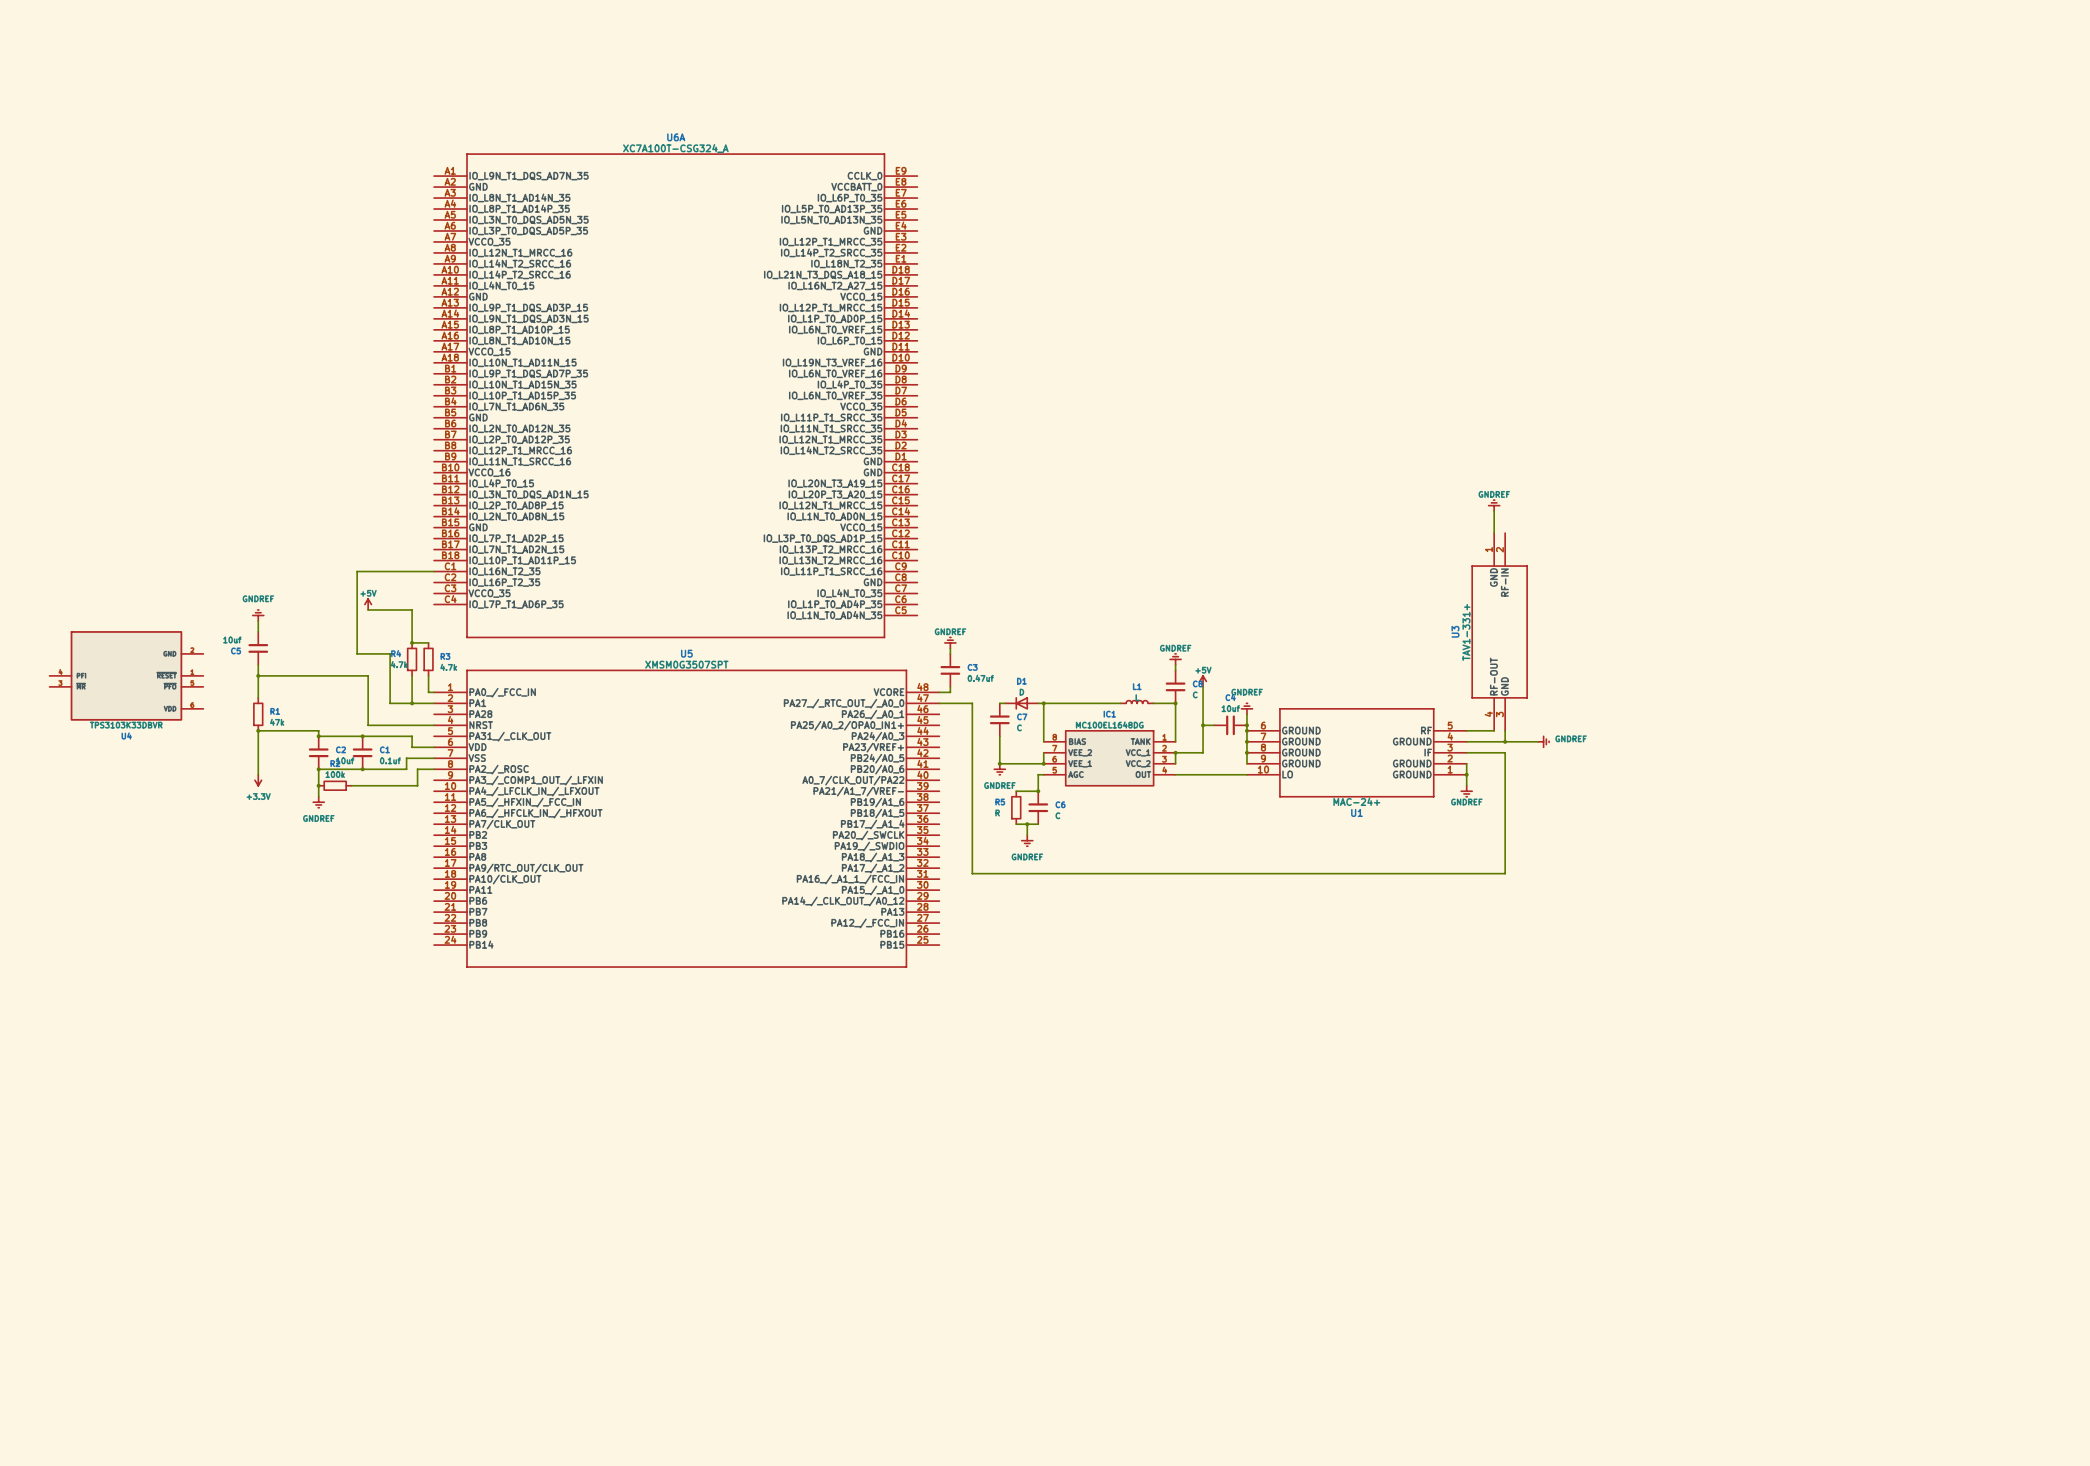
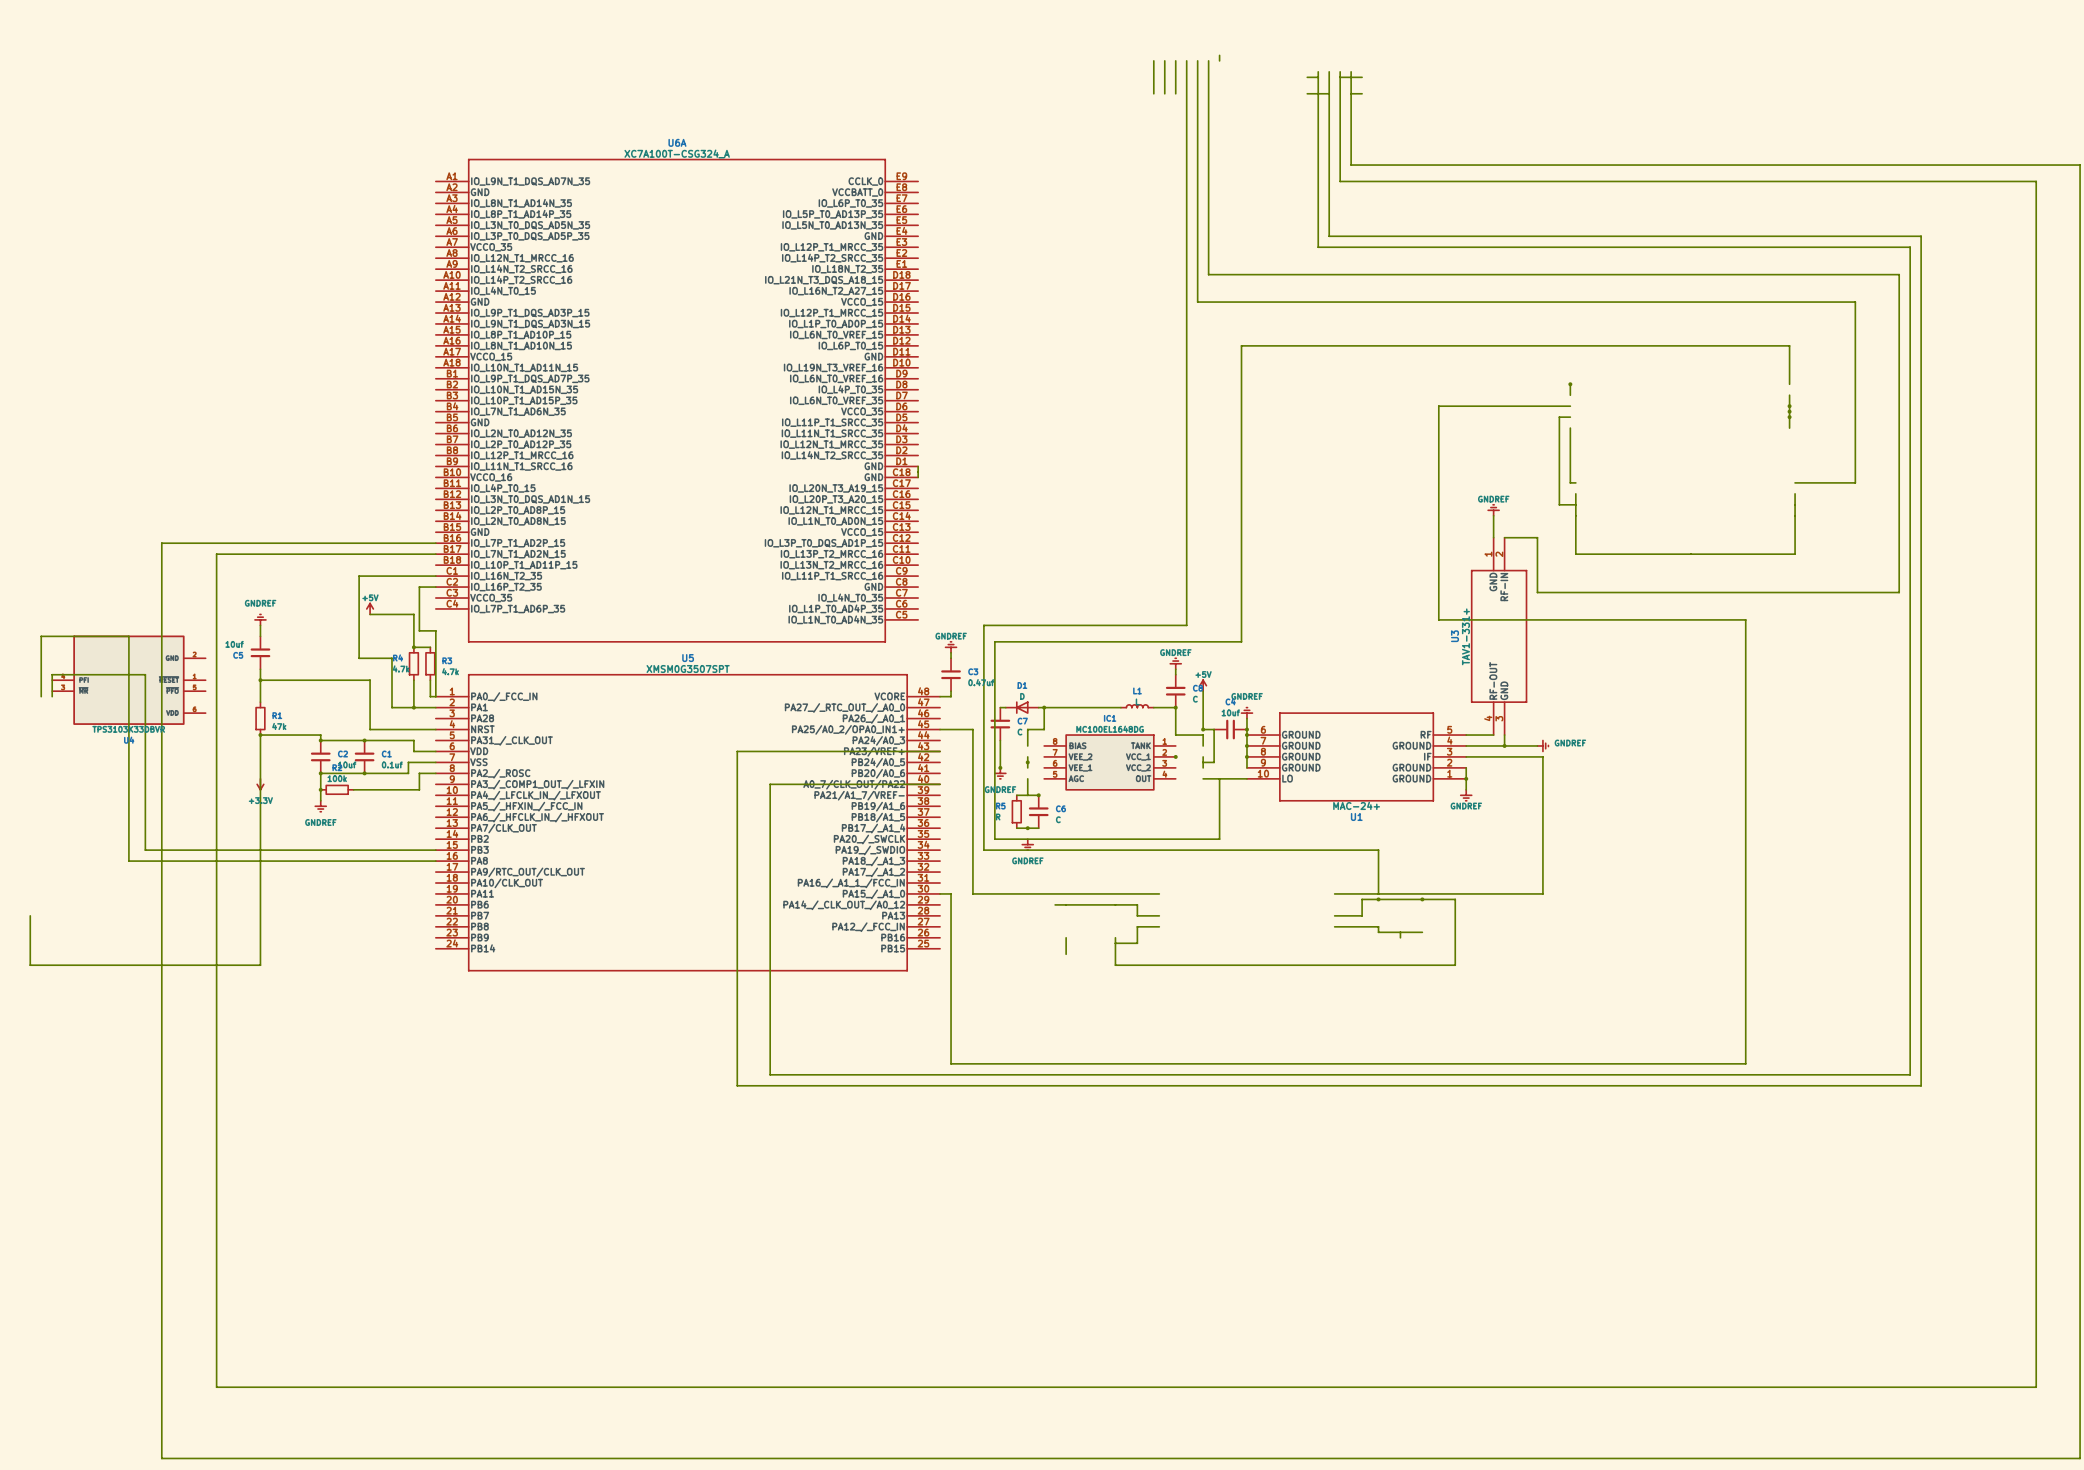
wire: none -> (1219, 55) (1219, 60)
wire: none -> (1153, 60) (1153, 93)
wire: none -> (1164, 60) (1164, 93)
wire: none -> (1175, 60) (1175, 93)
wire: none -> (1186, 60) (1186, 625) (983, 625) (983, 850) (1378, 850) (1378, 893)
wire: none -> (1197, 60) (1197, 302) (1855, 302) (1855, 482) (1795, 482)
wire: none -> (1208, 60) (1208, 274) (1899, 274) (1899, 592) (1537, 592) (1537, 537) (1504, 537)
wire: none -> (1318, 71) (1318, 247) (1910, 247) (1910, 1074) (770, 1074) (770, 784) (940, 784)
wire: none -> (1329, 71) (1329, 236) (1921, 236) (1921, 1085) (737, 1085) (737, 751) (940, 751)
wire: none -> (1340, 71) (1340, 181) (2036, 181) (2036, 1387) (216, 1387) (216, 554) (435, 554)
wire: none -> (1351, 71) (1351, 165) (2080, 165) (2080, 1458) (161, 1458) (161, 543) (435, 543)
wire: none -> (1307, 77) (1318, 77)
wire: none -> (1340, 77) (1362, 77)
wire: none -> (1307, 93) (1329, 93)
wire: none -> (1351, 93) (1362, 93)
wire: none -> (1570, 384) (1570, 395)
junction: none -> (1570, 384)
wire: none -> (1789, 384) (1789, 345) (1241, 345) (1241, 641) (994, 641) (994, 839) (1219, 839) (1219, 778)
wire: none -> (1789, 395) (1789, 428)
wire: none -> (1570, 406) (1438, 406) (1438, 619) (1745, 619) (1745, 1063) (951, 1063) (951, 893) (940, 893)
junction: none -> (1789, 406)
junction: none -> (1789, 411)
wire: none -> (1570, 417) (1559, 417) (1559, 504) (1575, 504)
junction: none -> (1789, 417)
wire: none -> (1570, 428) (1570, 482) (1575, 482)
wire: none -> (918, 466) (918, 477)
wire: none -> (1575, 493) (1575, 554) (1795, 554) (1795, 493)
wire: none -> (435, 587) (419, 587) (419, 630) (435, 630) (435, 696)
wire: none -> (41, 696) (41, 636) (128, 636) (128, 861) (435, 861)
wire: none -> (52, 696) (52, 674) (145, 674) (145, 850) (435, 850)
wire: (939, 703) (972, 703) (972, 725) -> (940, 729) (972, 729)
wire: (1043, 725) (1043, 741) -> (1044, 729) (1027, 729) (1027, 745)
wire: (1203, 725) (1203, 730) -> (1175, 735) (1203, 735)
wire: none -> (1214, 729) (1214, 762) (1203, 762)
wire: (1175, 730) (1175, 741) -> (1203, 756) (1203, 767)
wire: (1203, 741) (1203, 752) (1175, 752) (1175, 763) -> none
wire: (1043, 752) (1043, 763) (999, 763) -> none
wire: (1505, 752) (1505, 873) (972, 873) -> (1504, 756) (1542, 756) (1542, 893) (1334, 893)
junction position: (1043, 763) -> (1027, 762)
wire: none -> (260, 778) (260, 965) (30, 965) (30, 915)
wire: none -> (1027, 778) (1027, 795)
wire: (1043, 774) (1038, 774) (1038, 791) -> none
wire: (1175, 774) (1203, 774) -> none
wire: (1027, 824) (1027, 835) -> (1027, 756) (1027, 767)
wire: none -> (972, 877) (972, 893) (1159, 893)
junction: none -> (1378, 899)
junction: none -> (1422, 899)
wire: none -> (1055, 904) (1137, 904) (1137, 915) (1159, 915)
wire: none -> (1334, 915) (1362, 915) (1362, 899) (1455, 899) (1455, 965) (1115, 965) (1115, 937)
wire: none -> (1159, 926) (1137, 926) (1137, 943) (1115, 943)
wire: none -> (1334, 926) (1378, 926) (1378, 932) (1422, 932)
wire: none -> (1400, 932) (1400, 937)
wire: none -> (1066, 937) (1066, 954)

